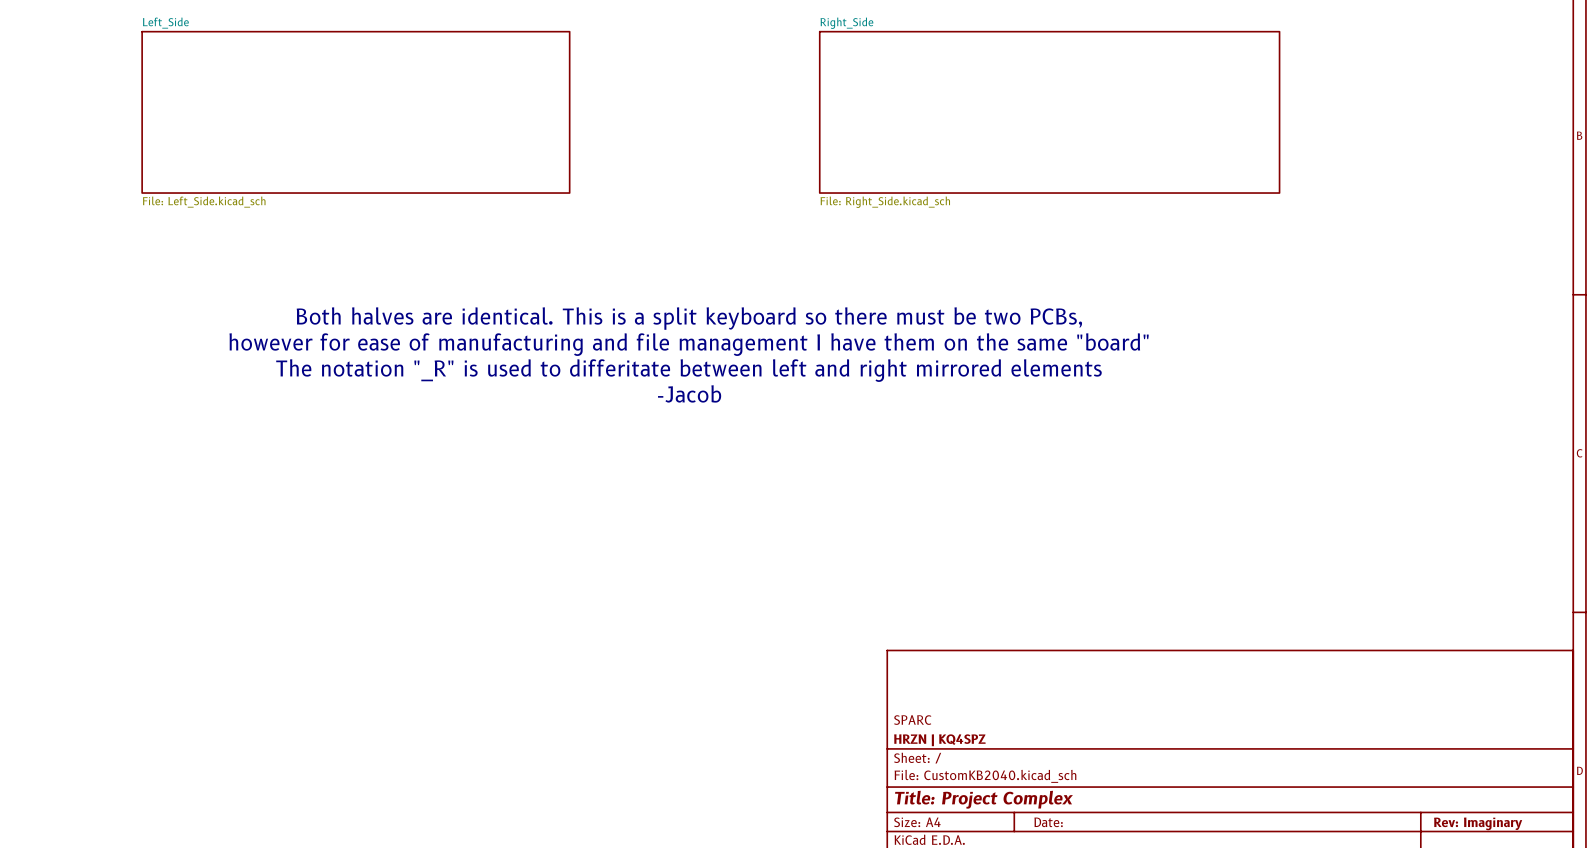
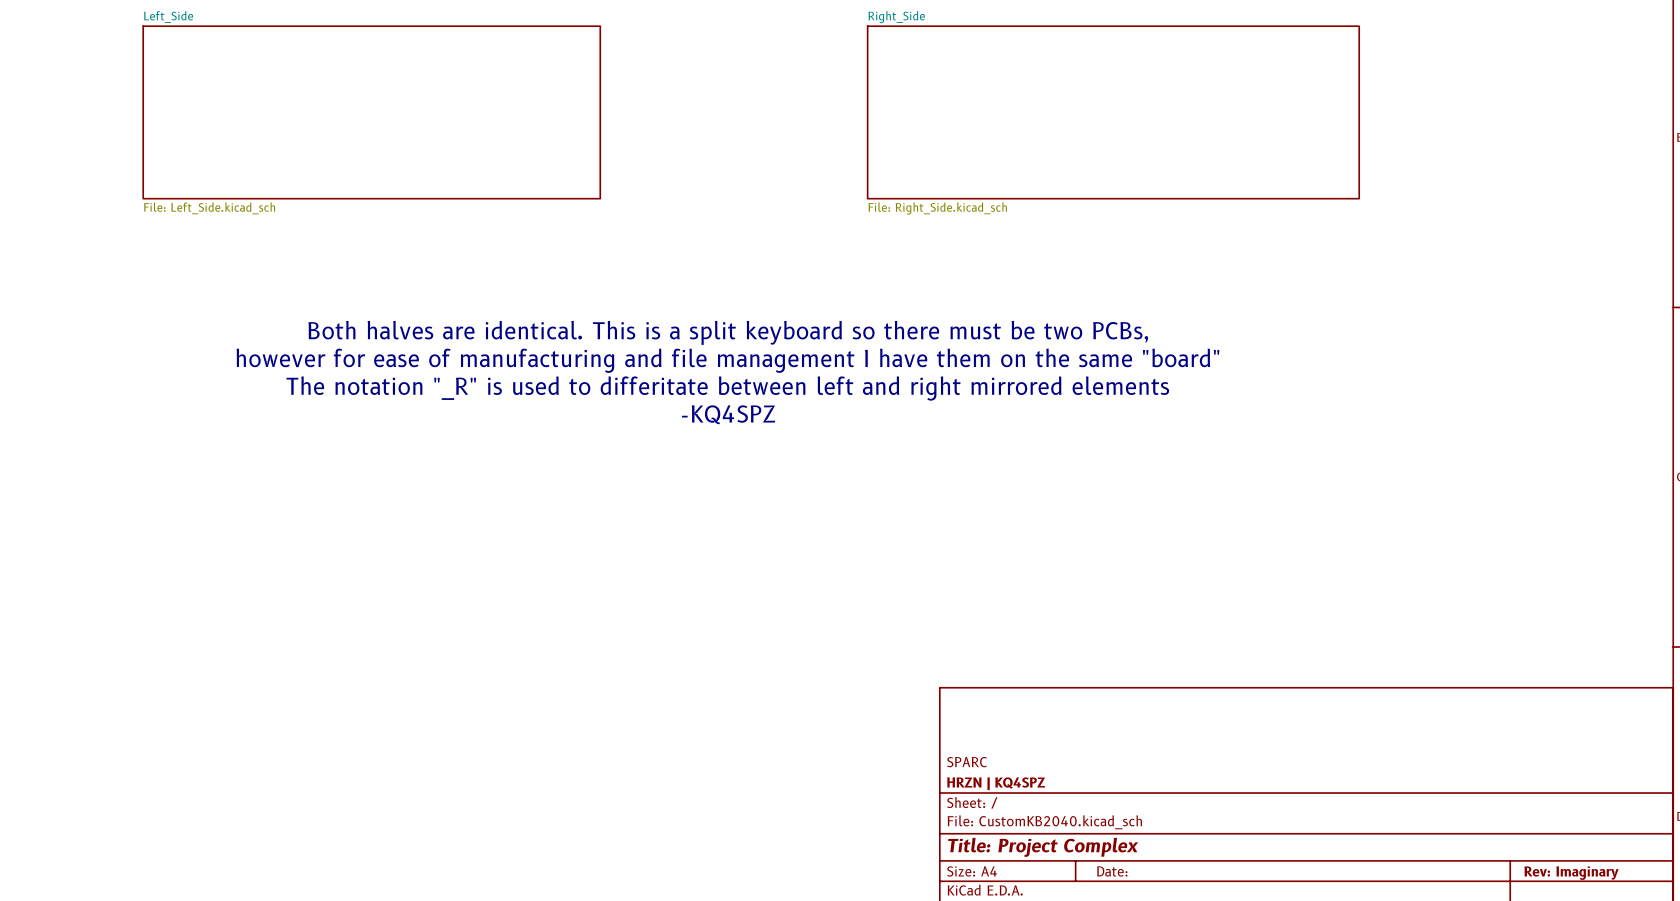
text: -Jacob (689, 393) -> -KQ4SPZ (728, 414)

